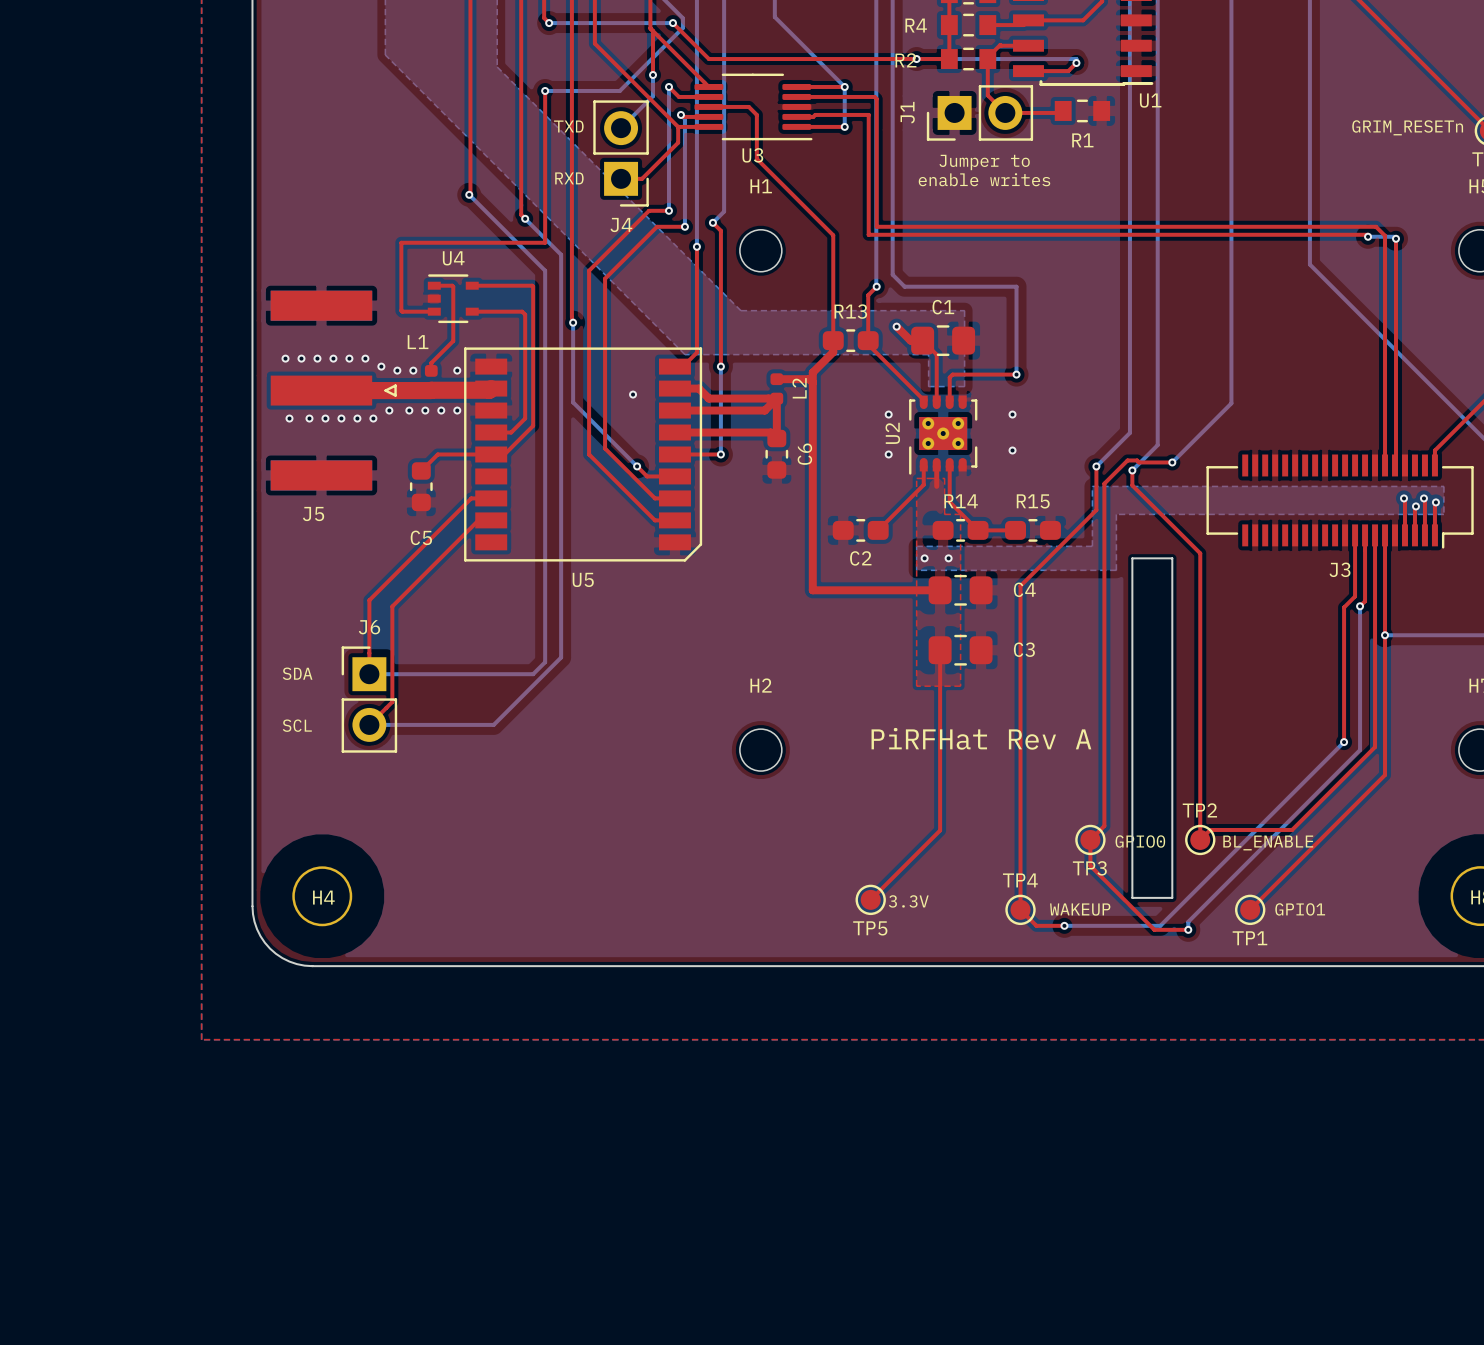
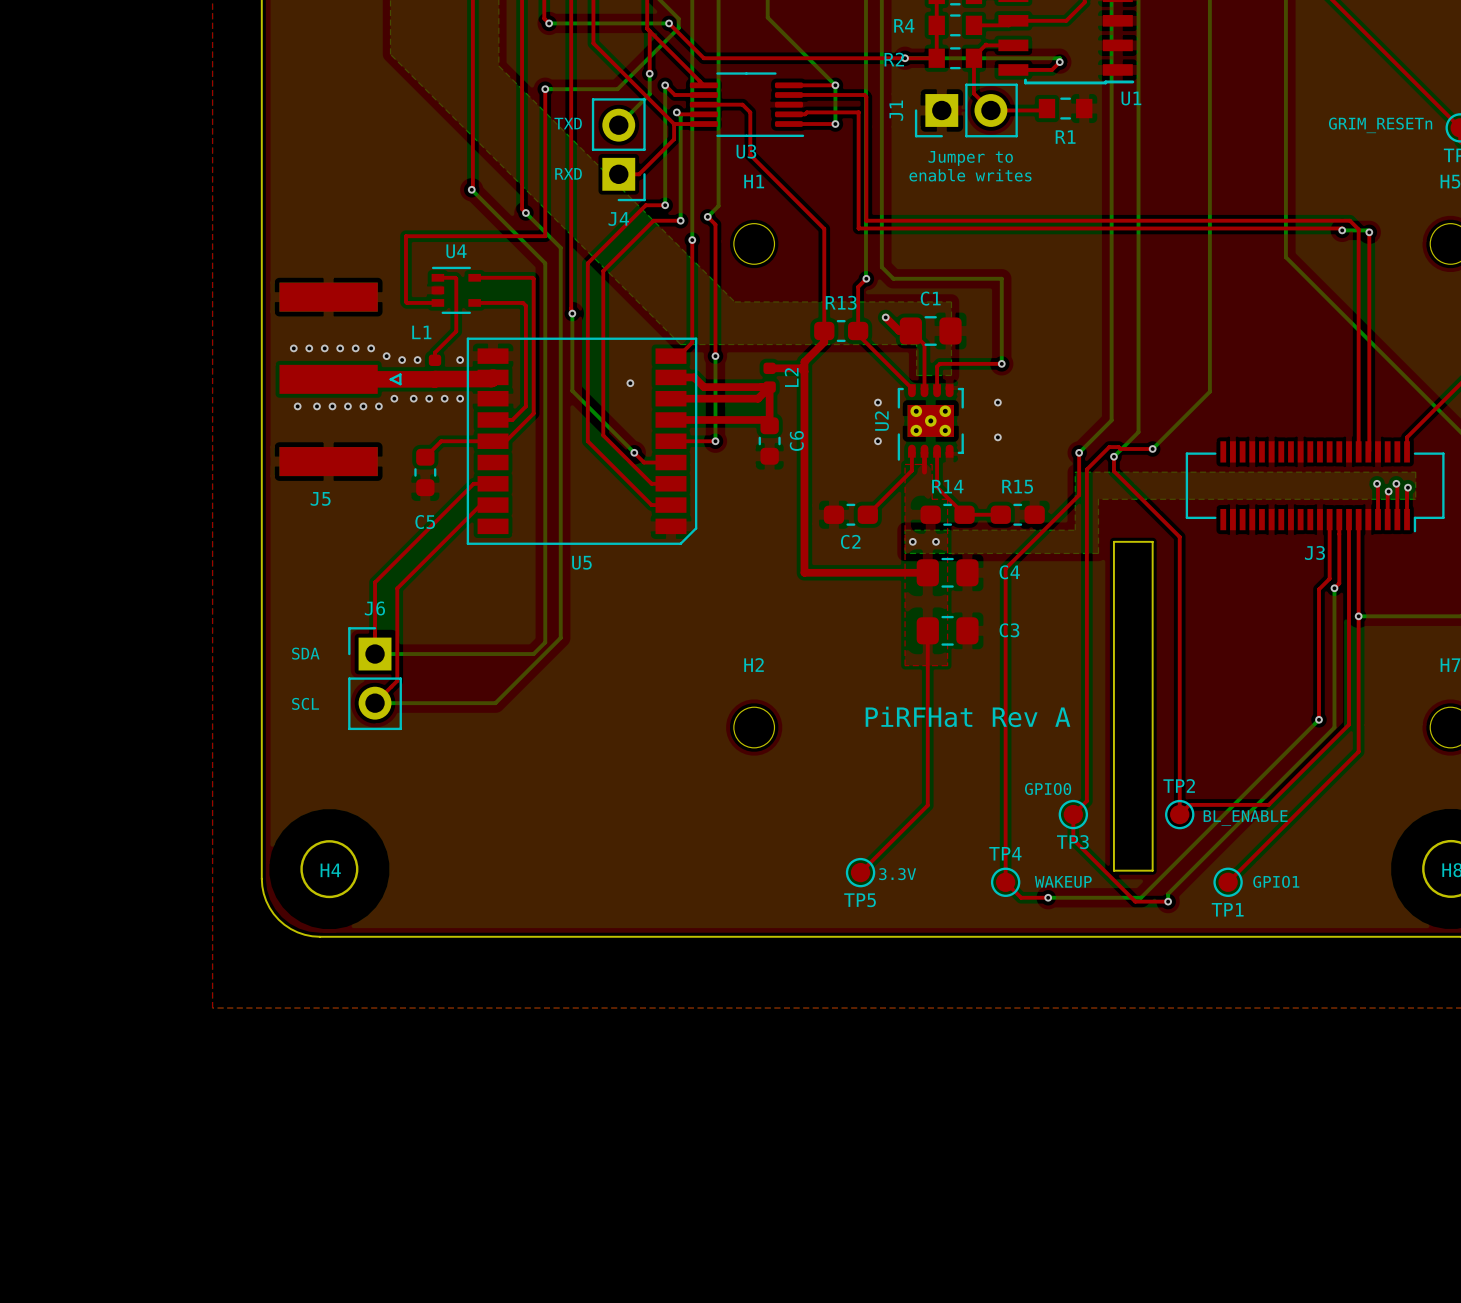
text position: GPIO0 (1140, 841) -> GPIO0 (1048, 789)

